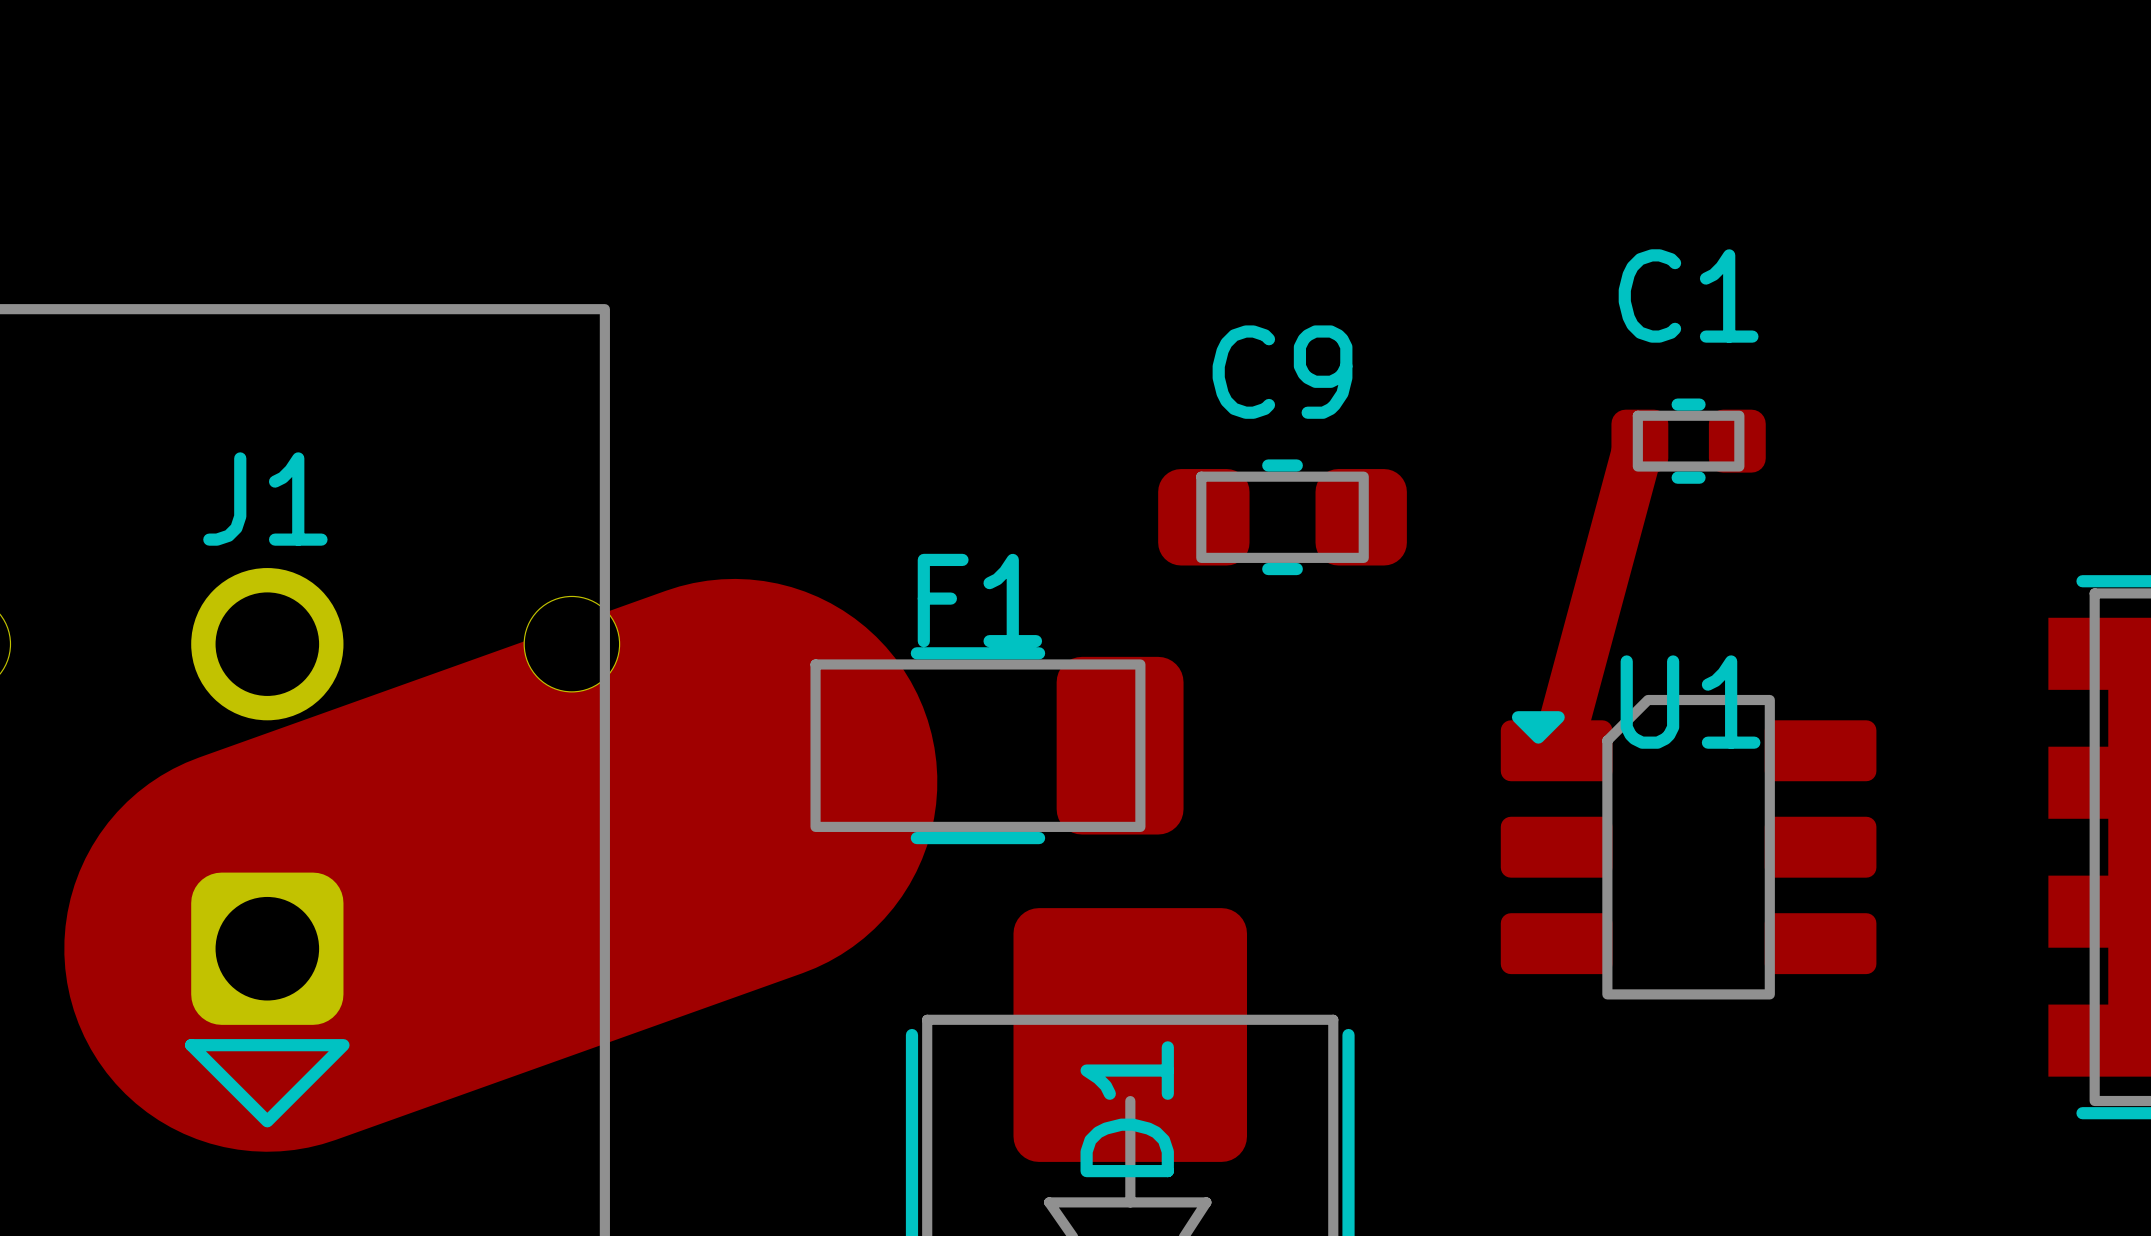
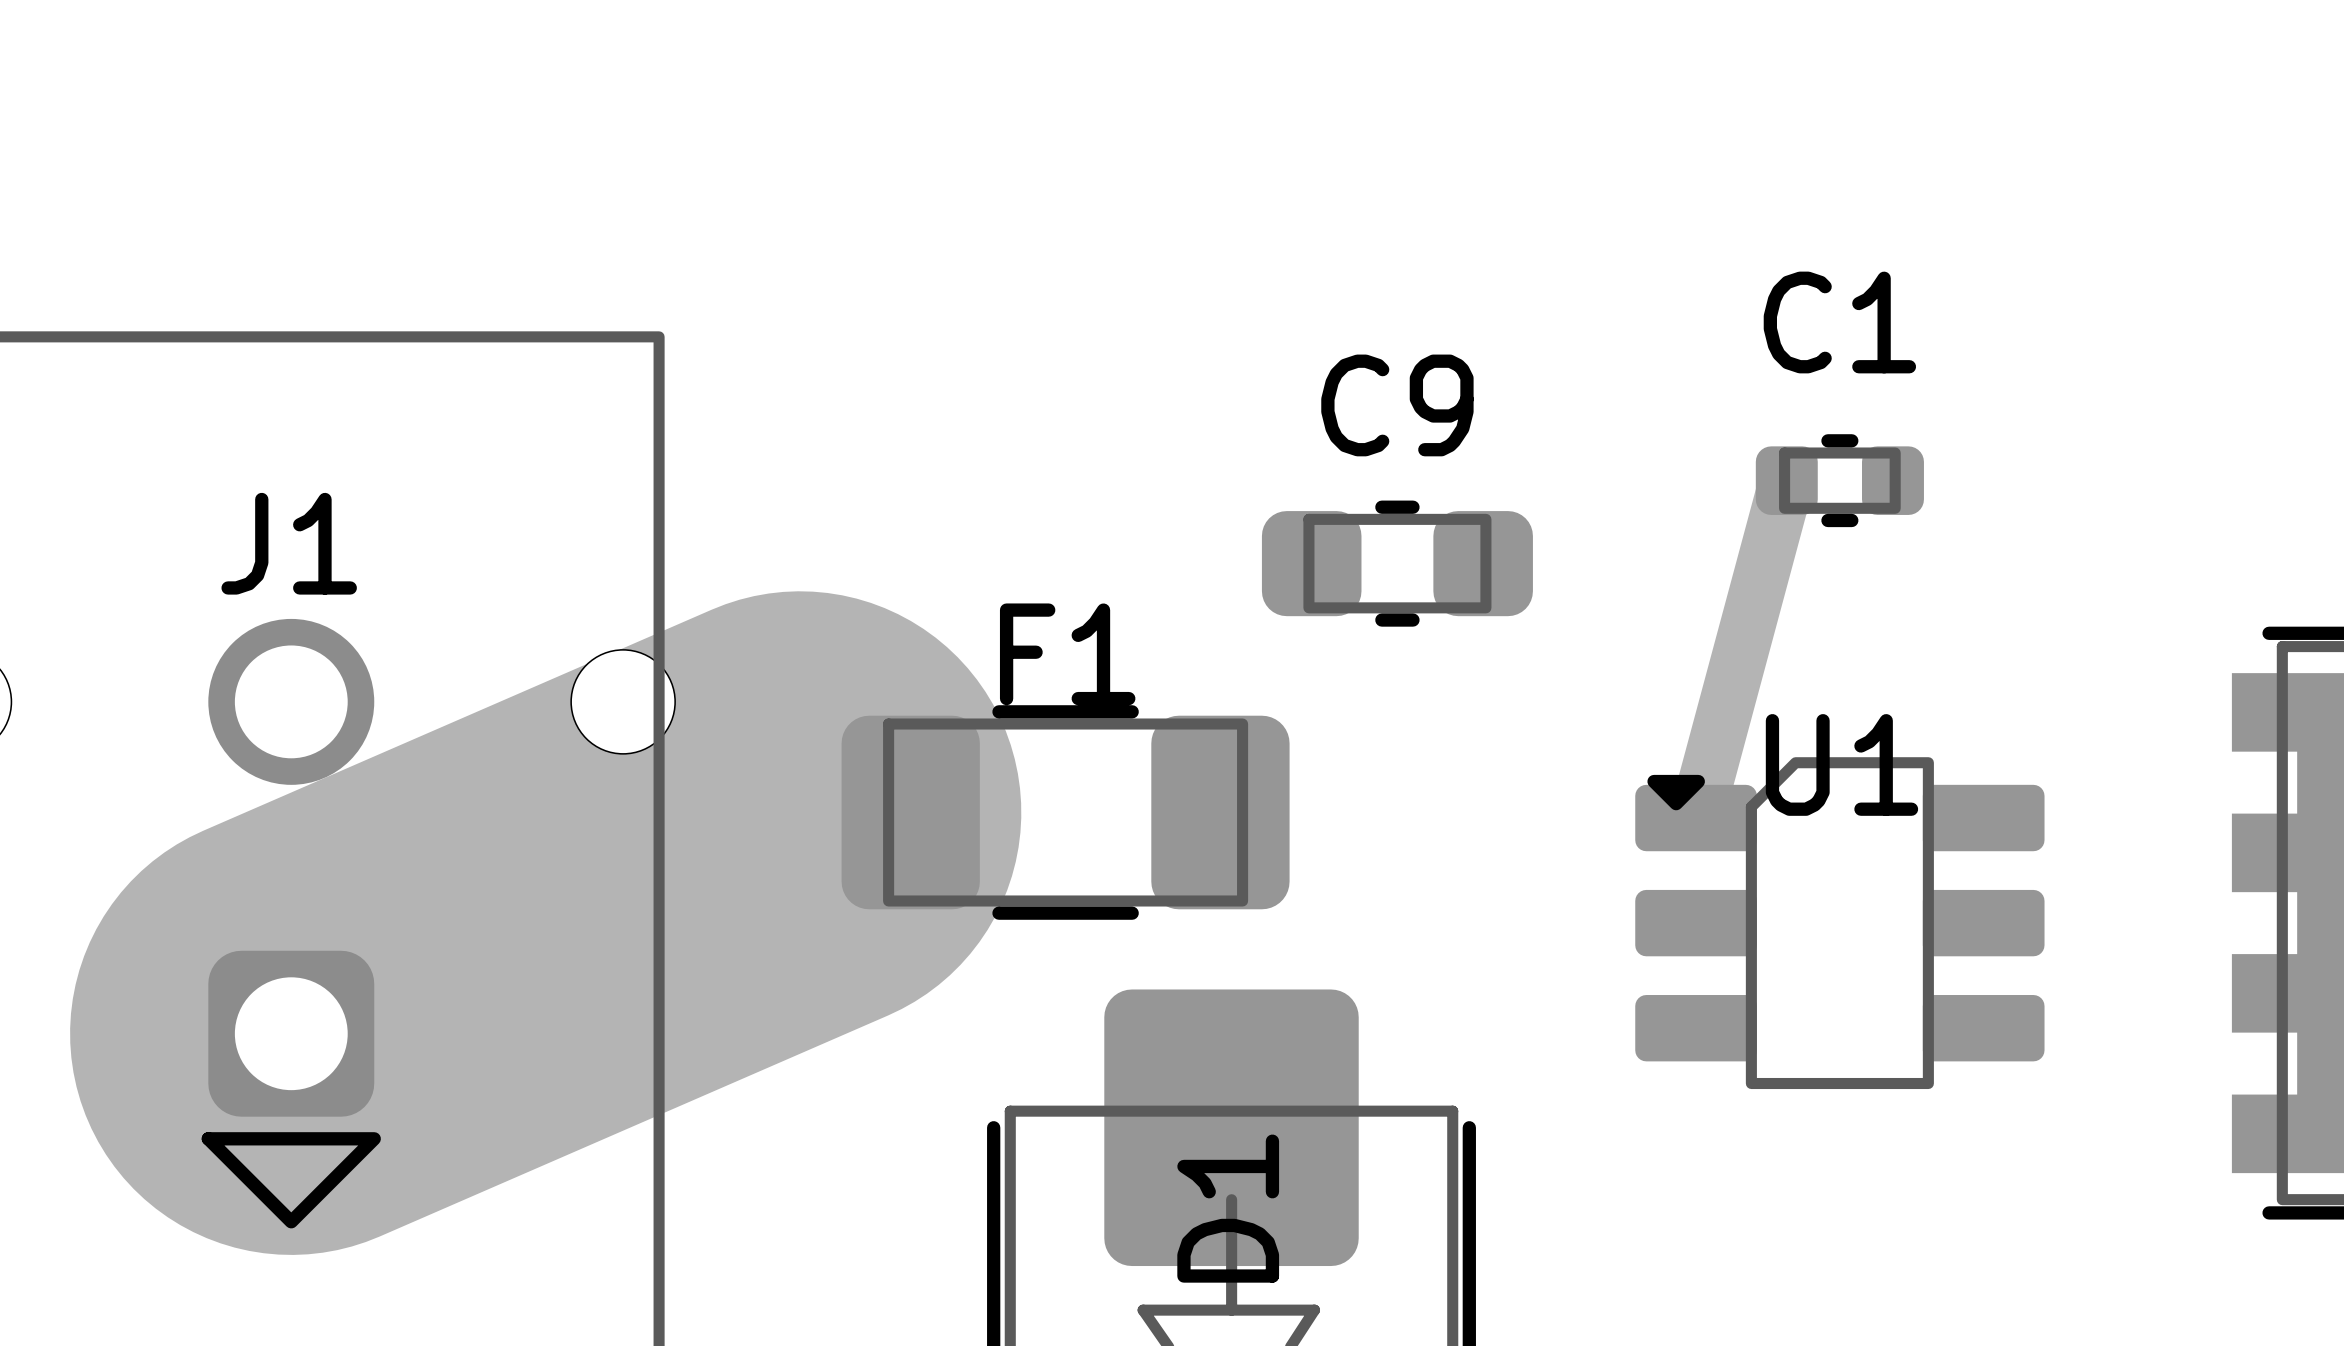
track: (734, 781) (267, 948) -> (800, 812) (291, 1033)

